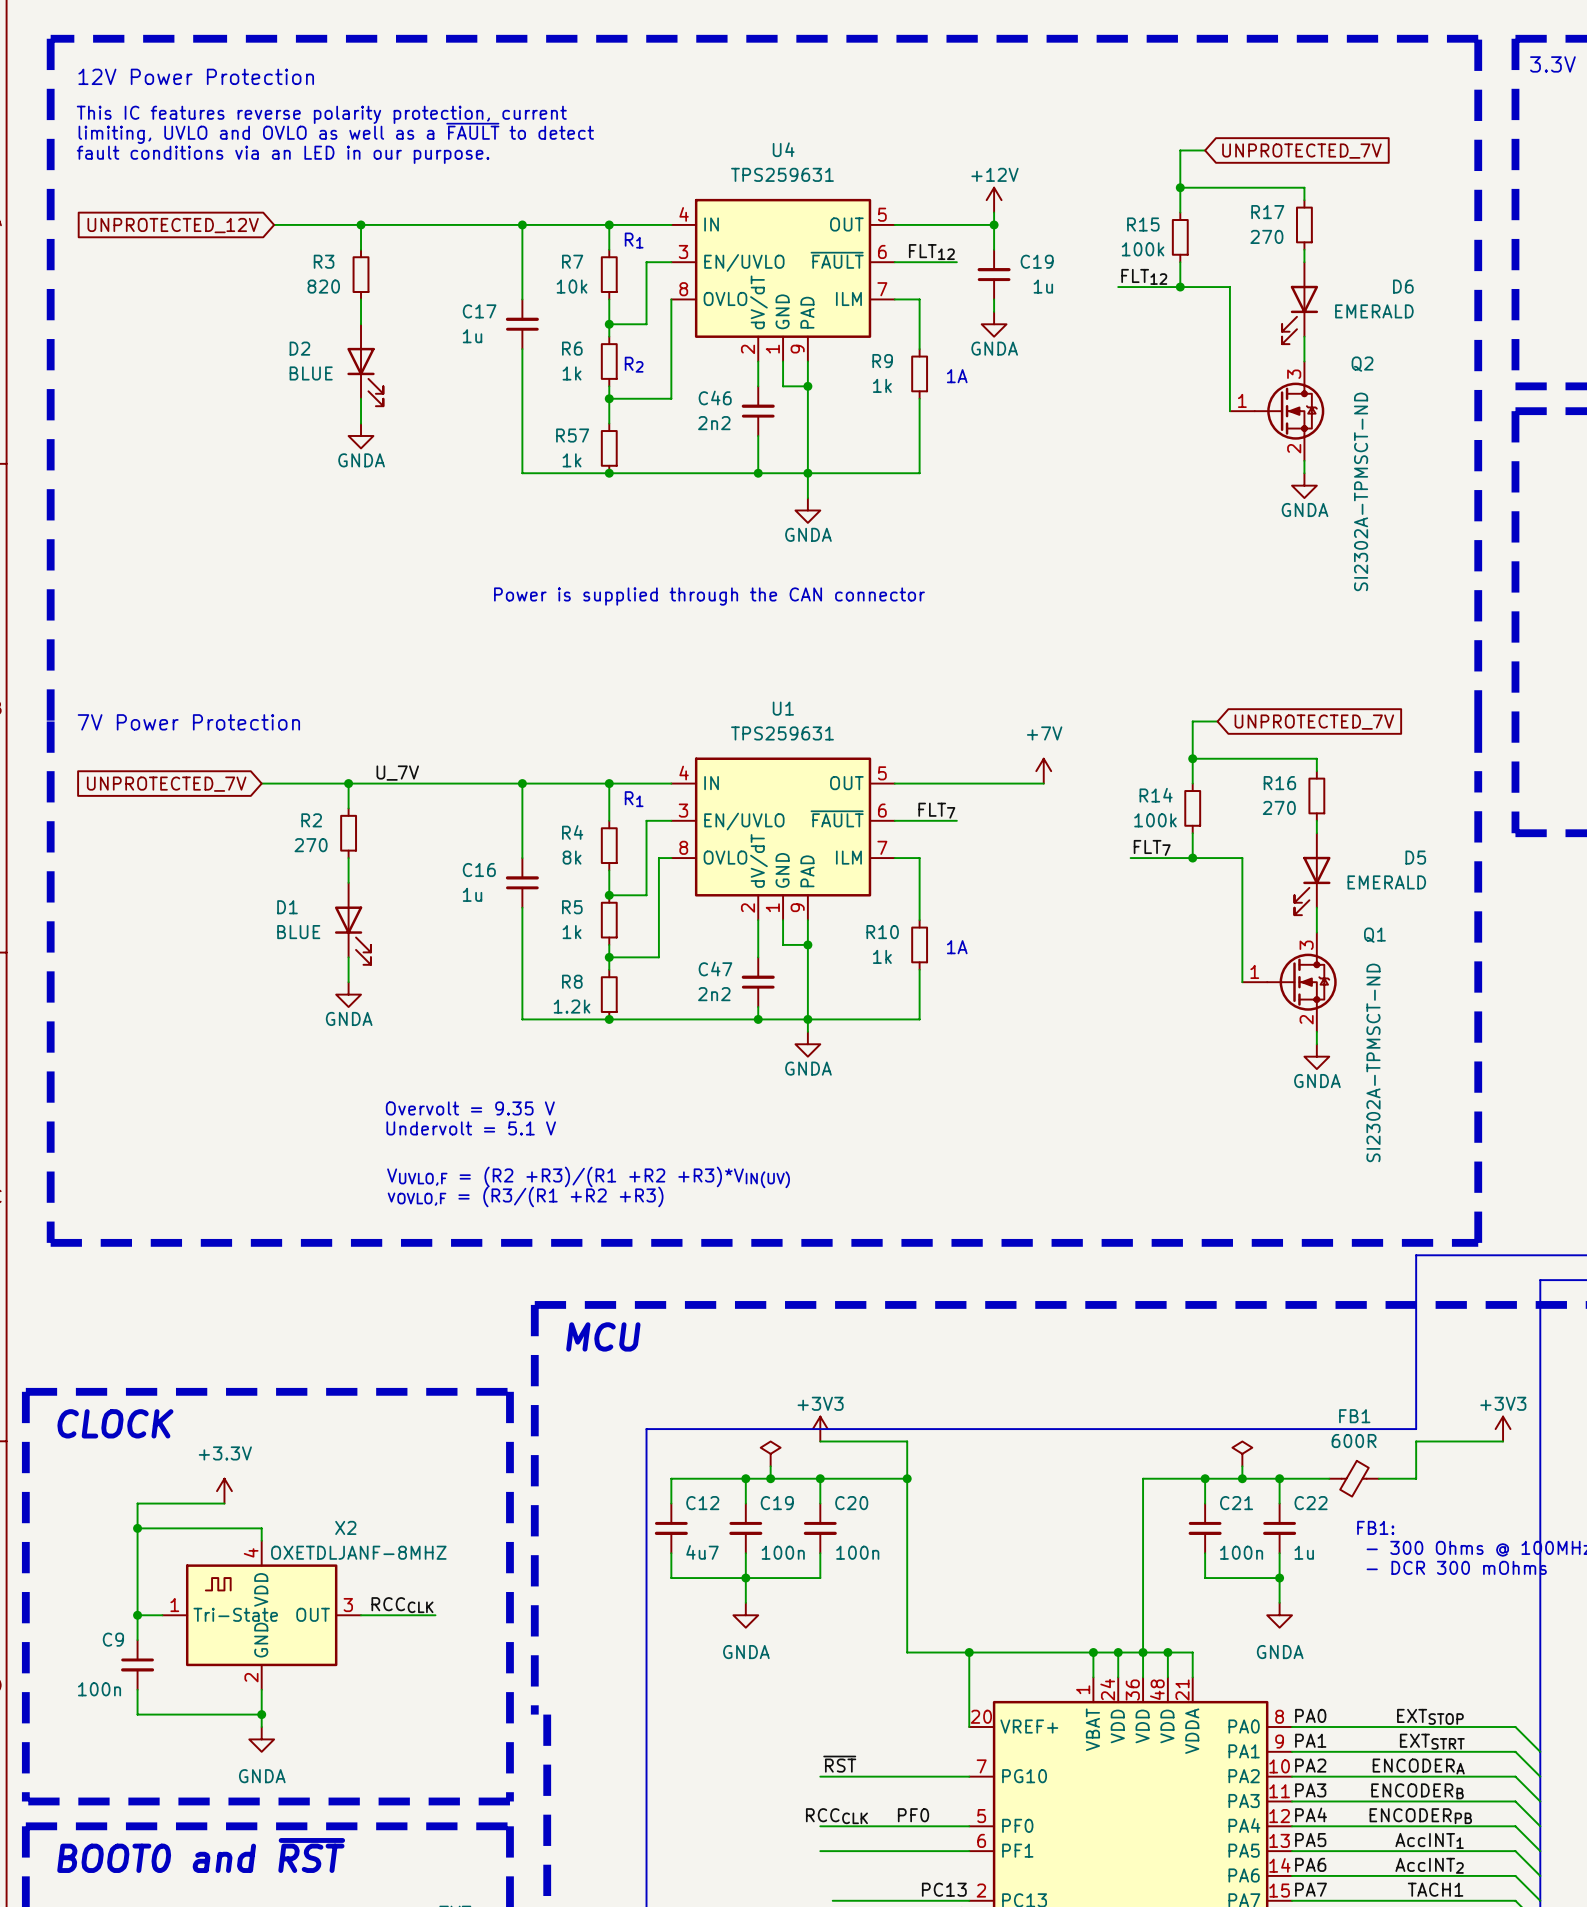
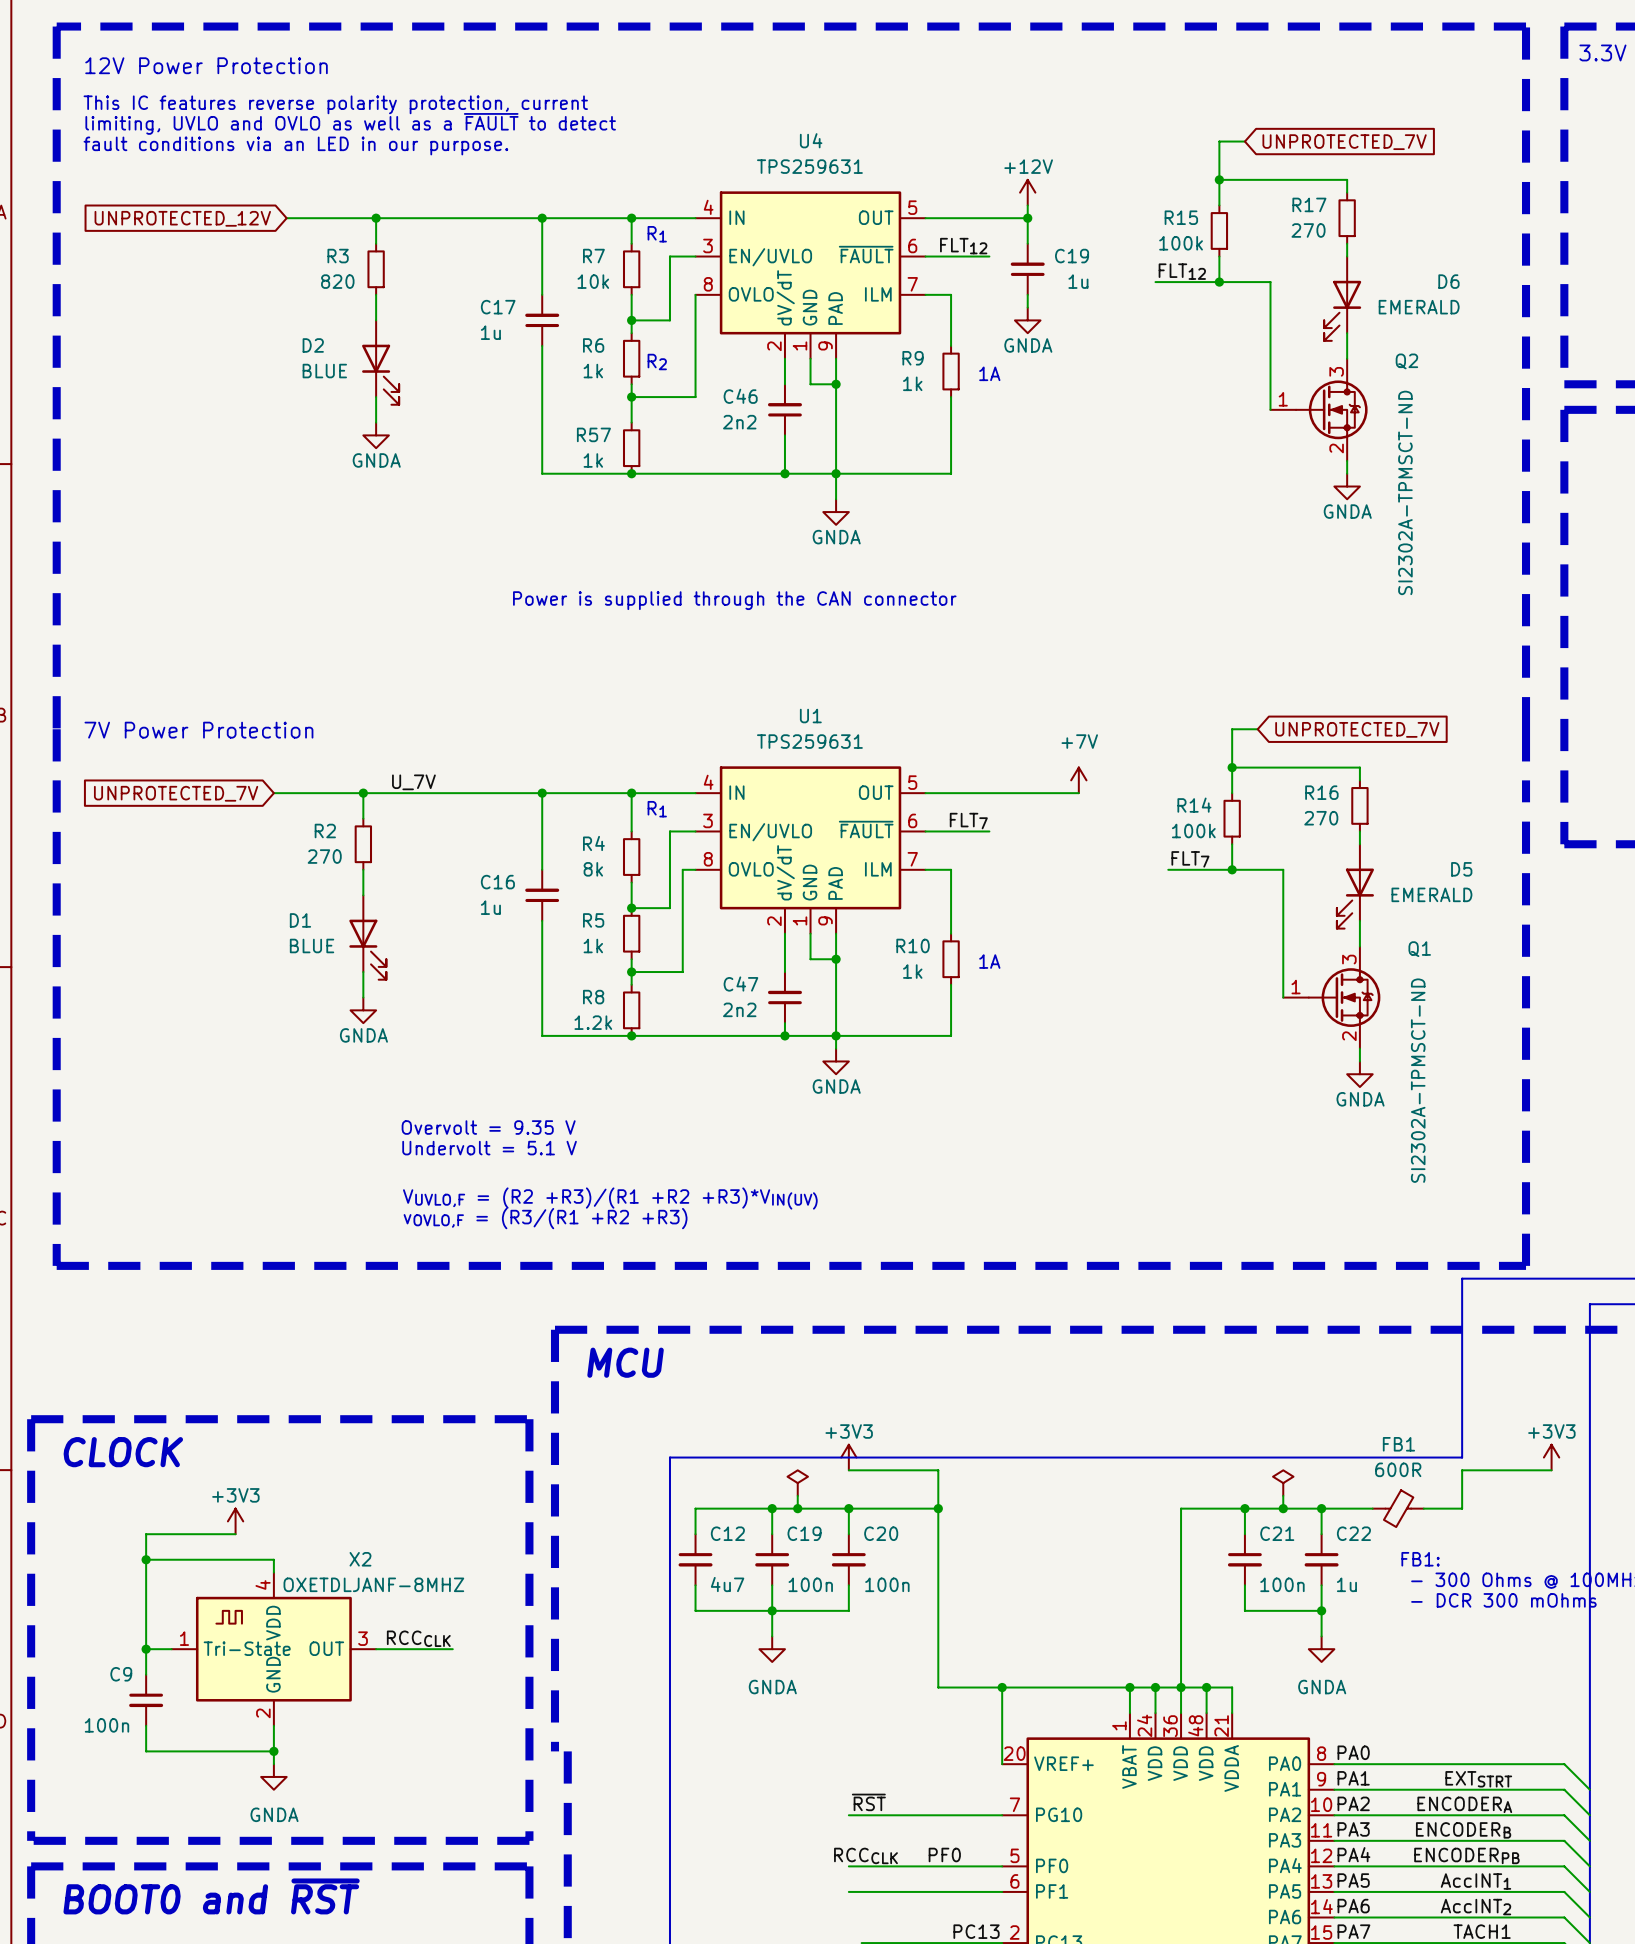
power symbol: +3.3V (224, 1491) -> +3V3 (235, 1521)
label: EXTSTOP (1430, 1716) -> none

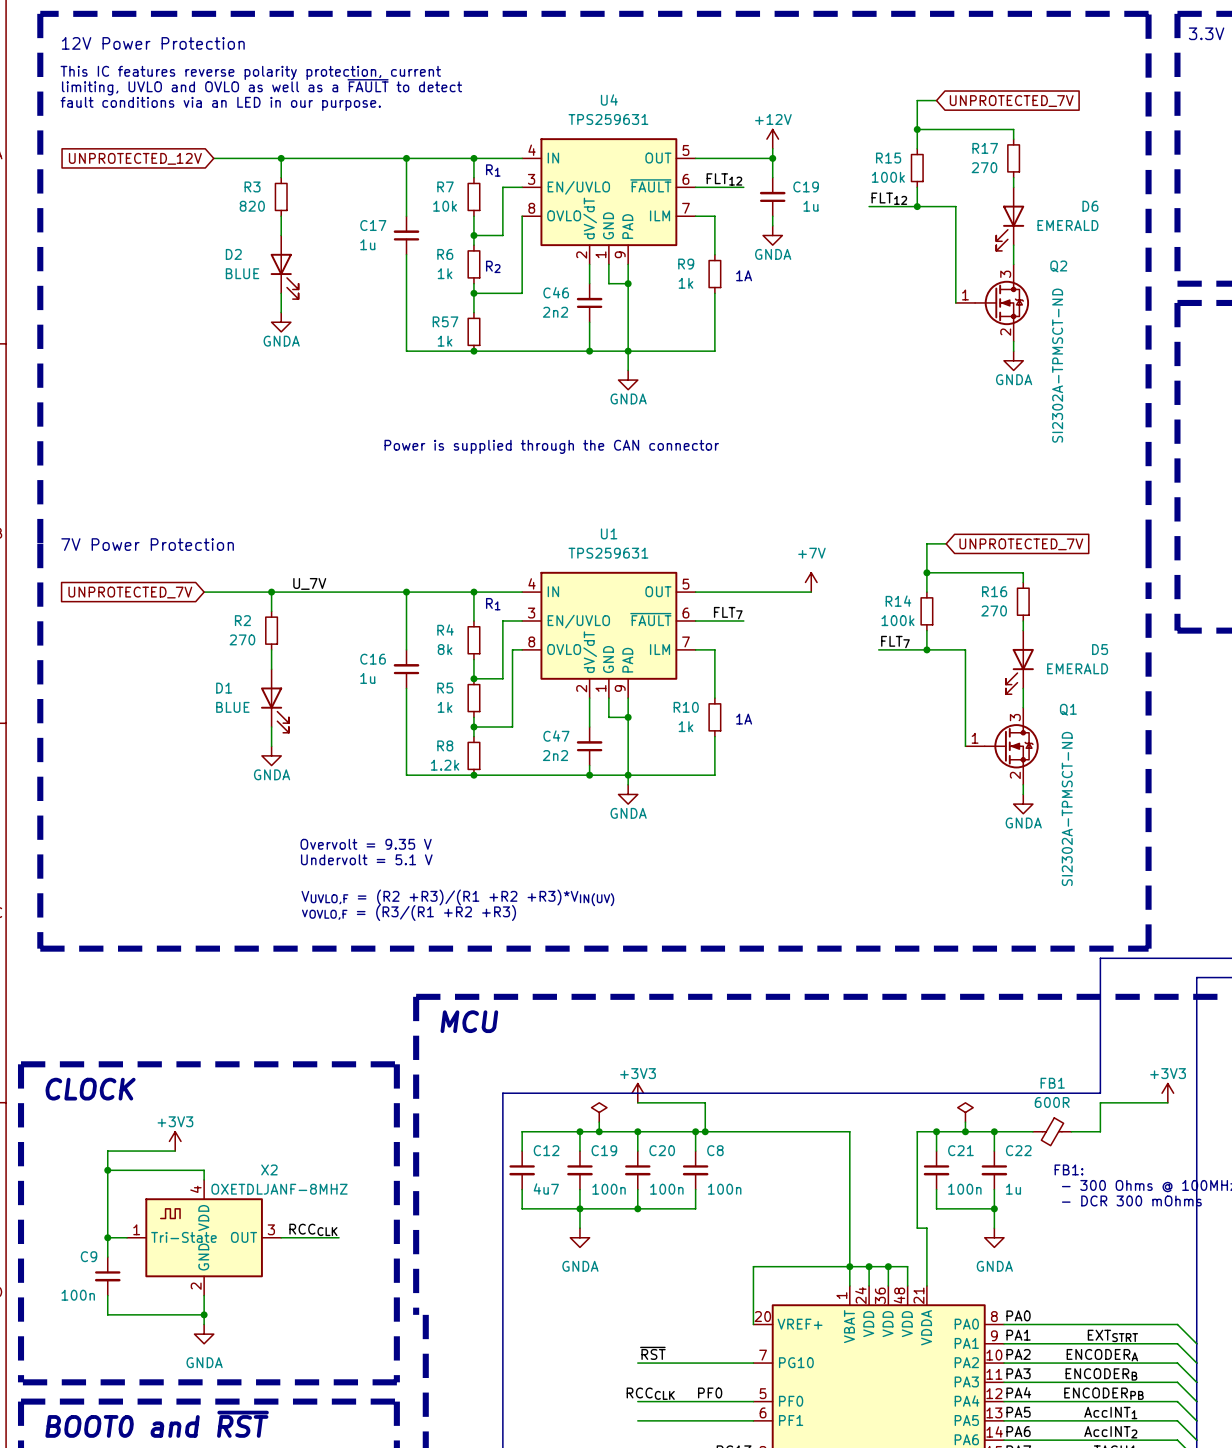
wire: none -> (695, 1131) (695, 1151)
junction: none -> (695, 1131)
wire: (938, 1508) (938, 1687) (1002, 1687) -> (705, 1131) (849, 1131) (849, 1266)
wire: (1219, 1508) (1181, 1508) (1181, 1687) -> (917, 1131) (917, 1228) (926, 1228) (926, 1266)
C8: none -> 100n (695, 1170)
wire: none -> (695, 1189) (695, 1208) (637, 1208)
junction: none -> (637, 1208)
junction: (1002, 1687) -> none
wire: (1206, 1687) (1232, 1687) -> none
junction: (1206, 1687) -> none

